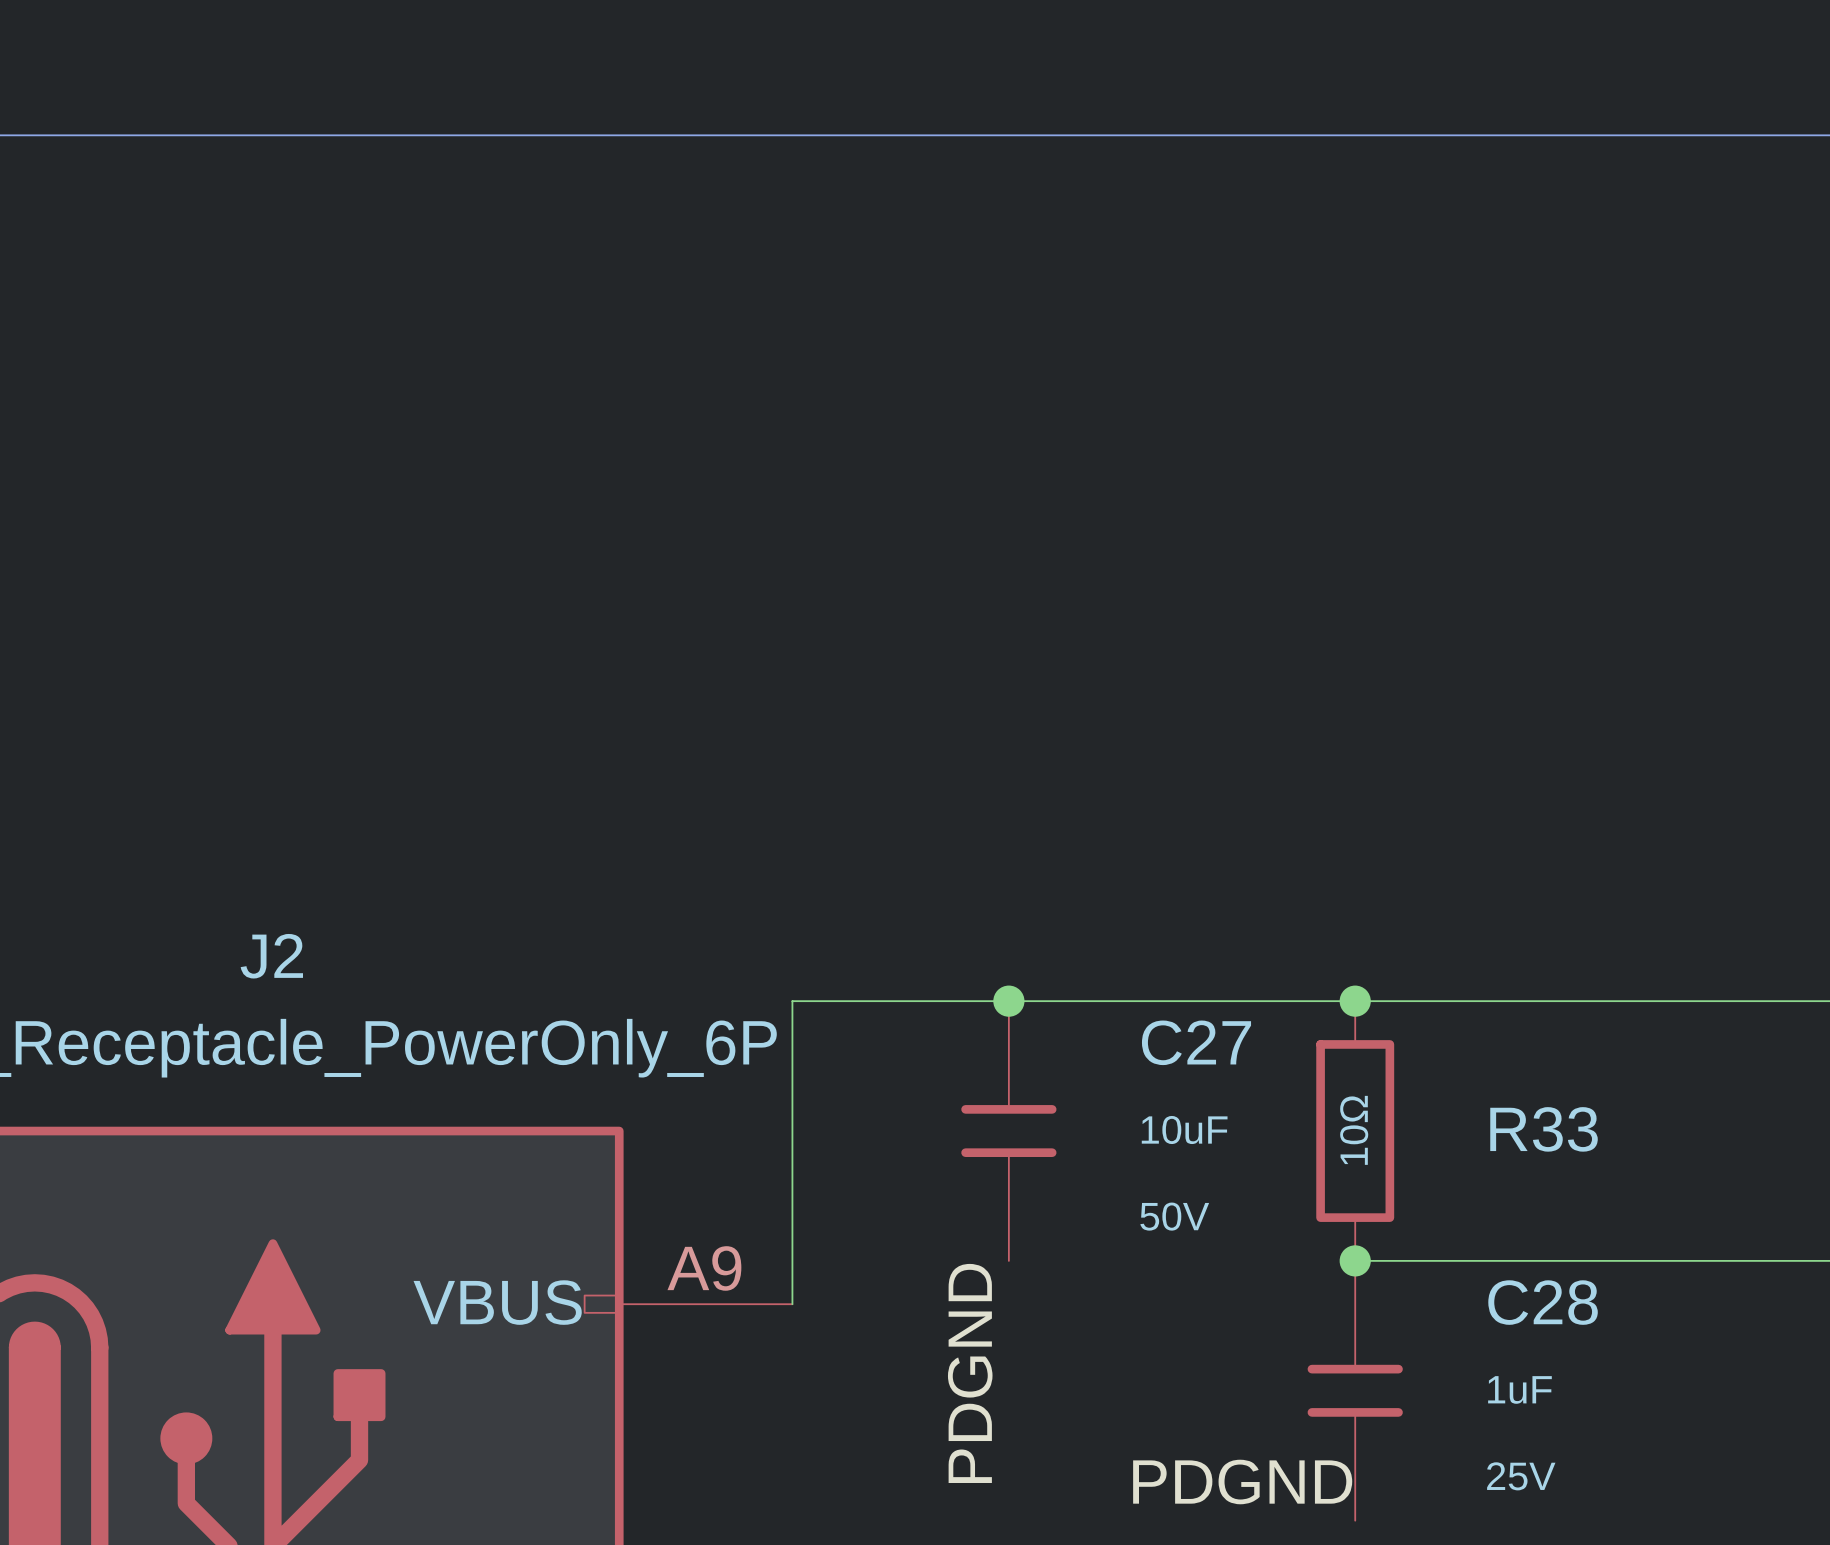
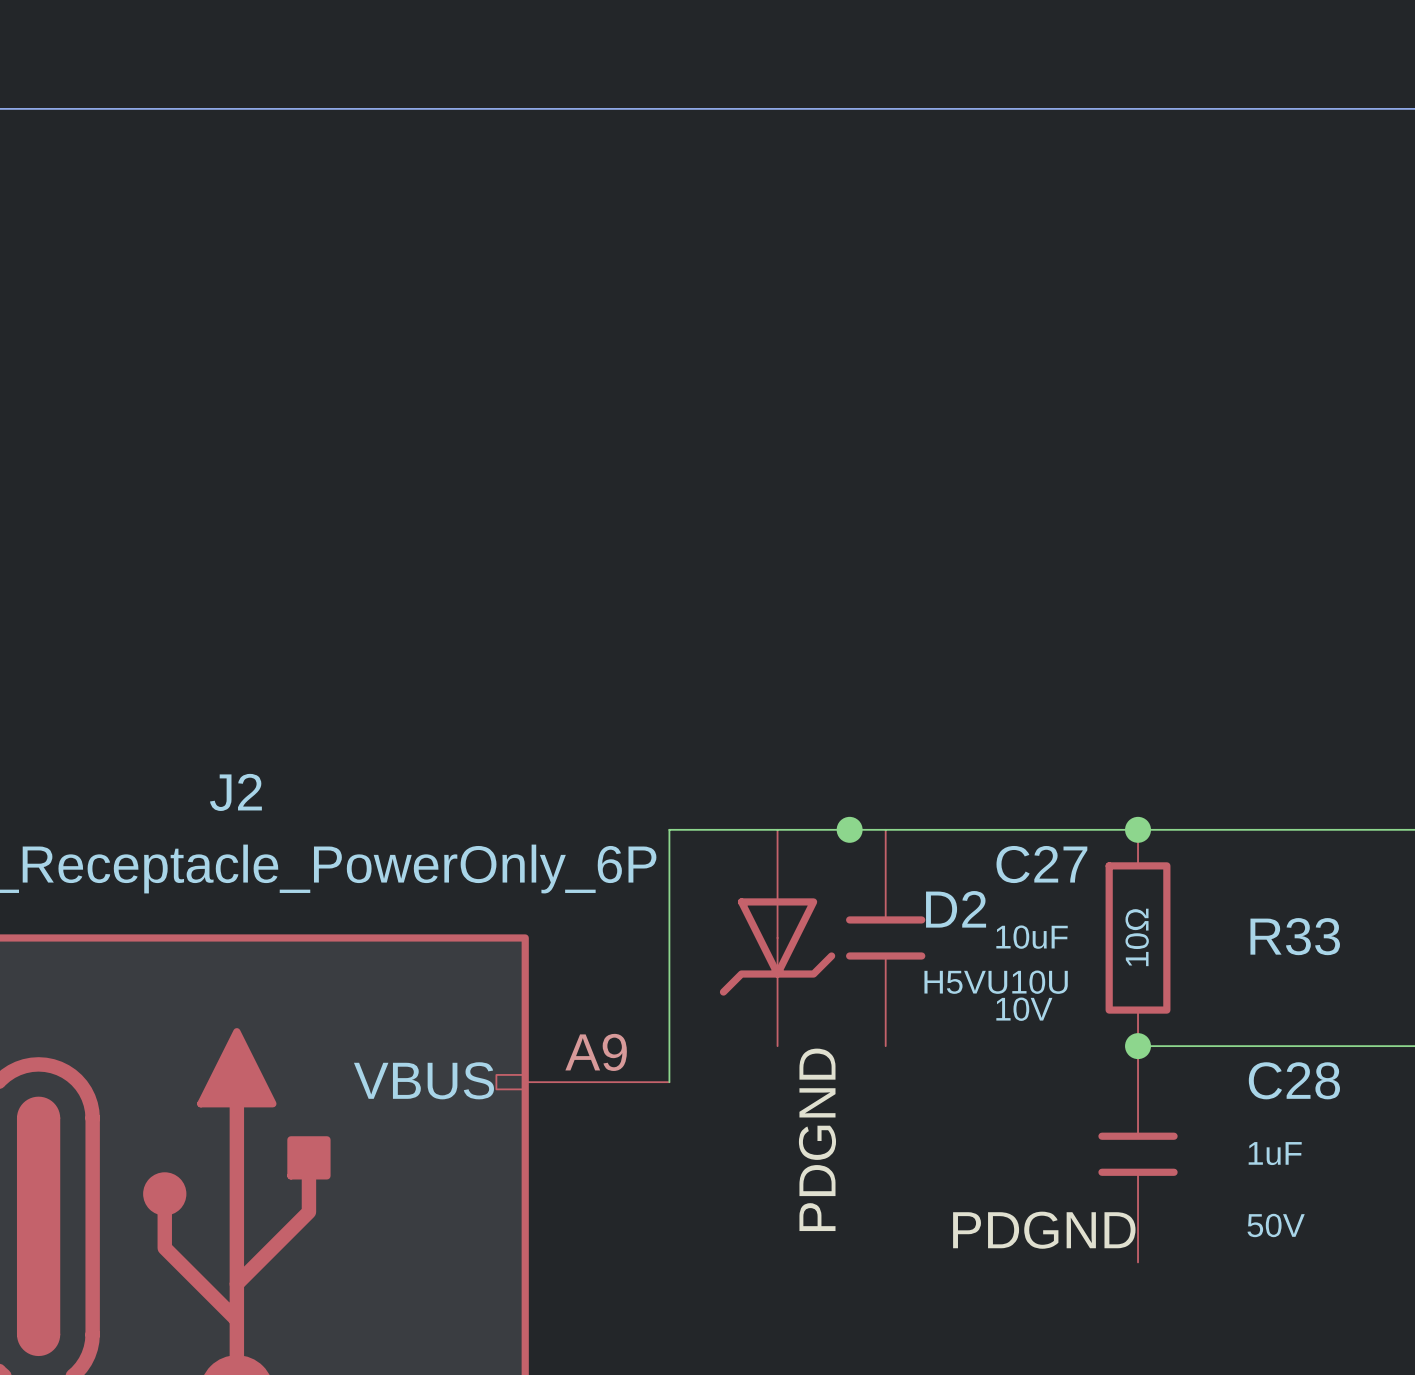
D2: none -> H5VU10U (777, 937)
C27 position: (1008, 1131) -> (885, 937)
C27 text: 50V (1174, 1216) -> 10V (1024, 1009)
C28 text: 25V (1521, 1476) -> 50V (1276, 1225)

